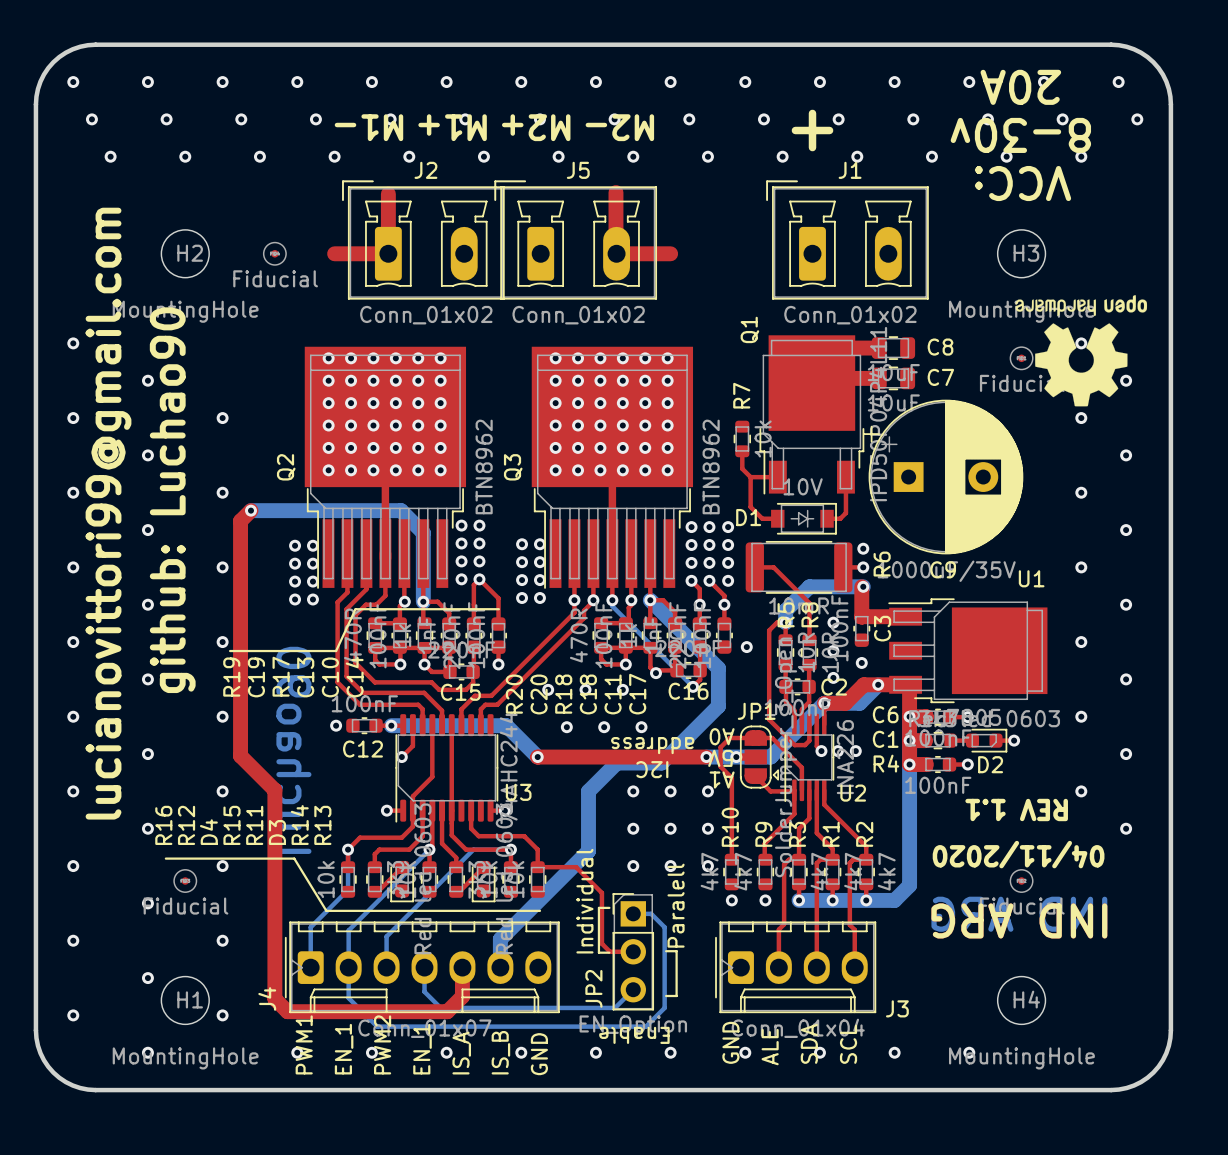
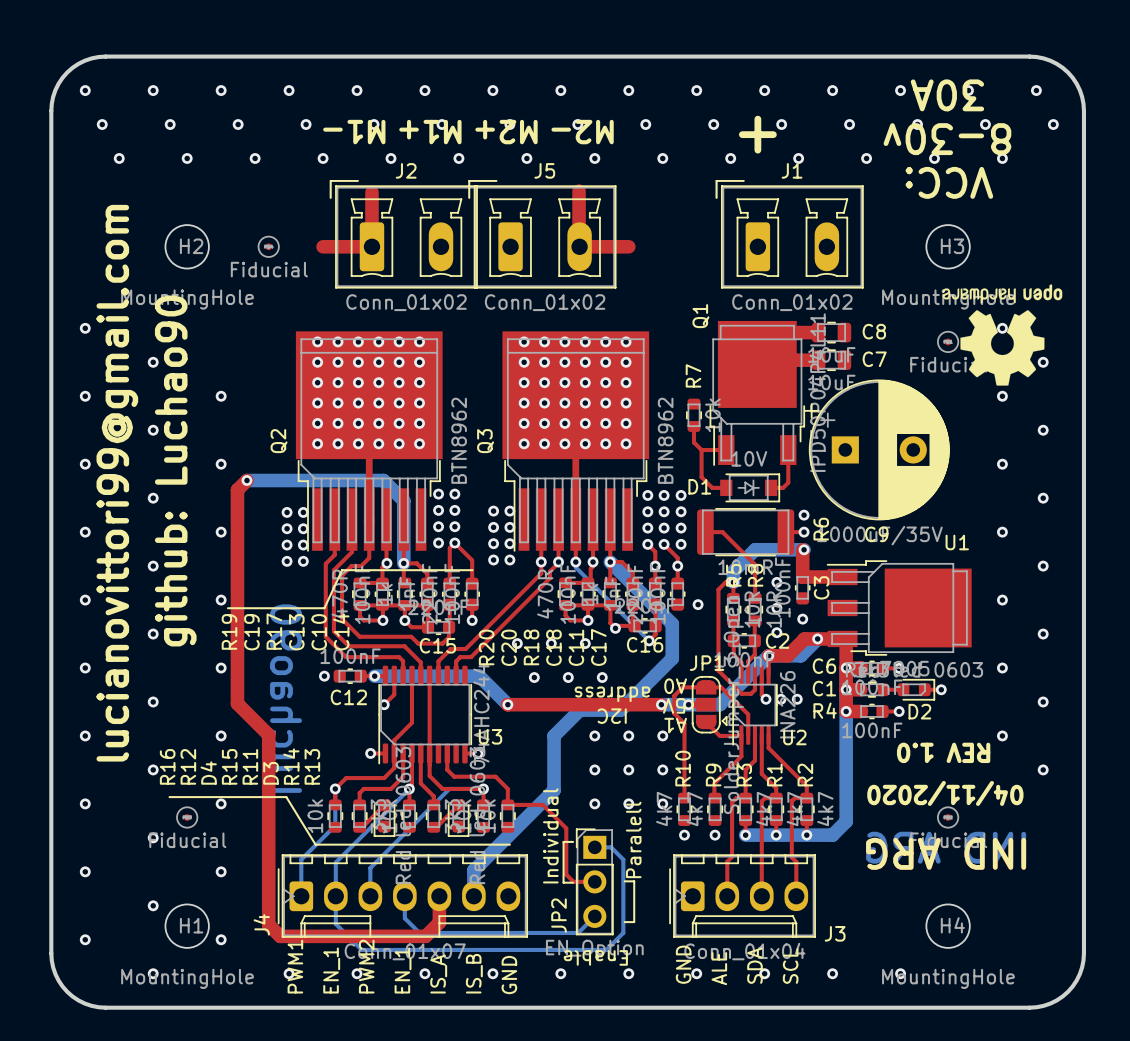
text: 20A (1020, 87) -> 30A (947, 95)
text: REV 1.1 (1016, 809) -> REV 1.0 (943, 752)

